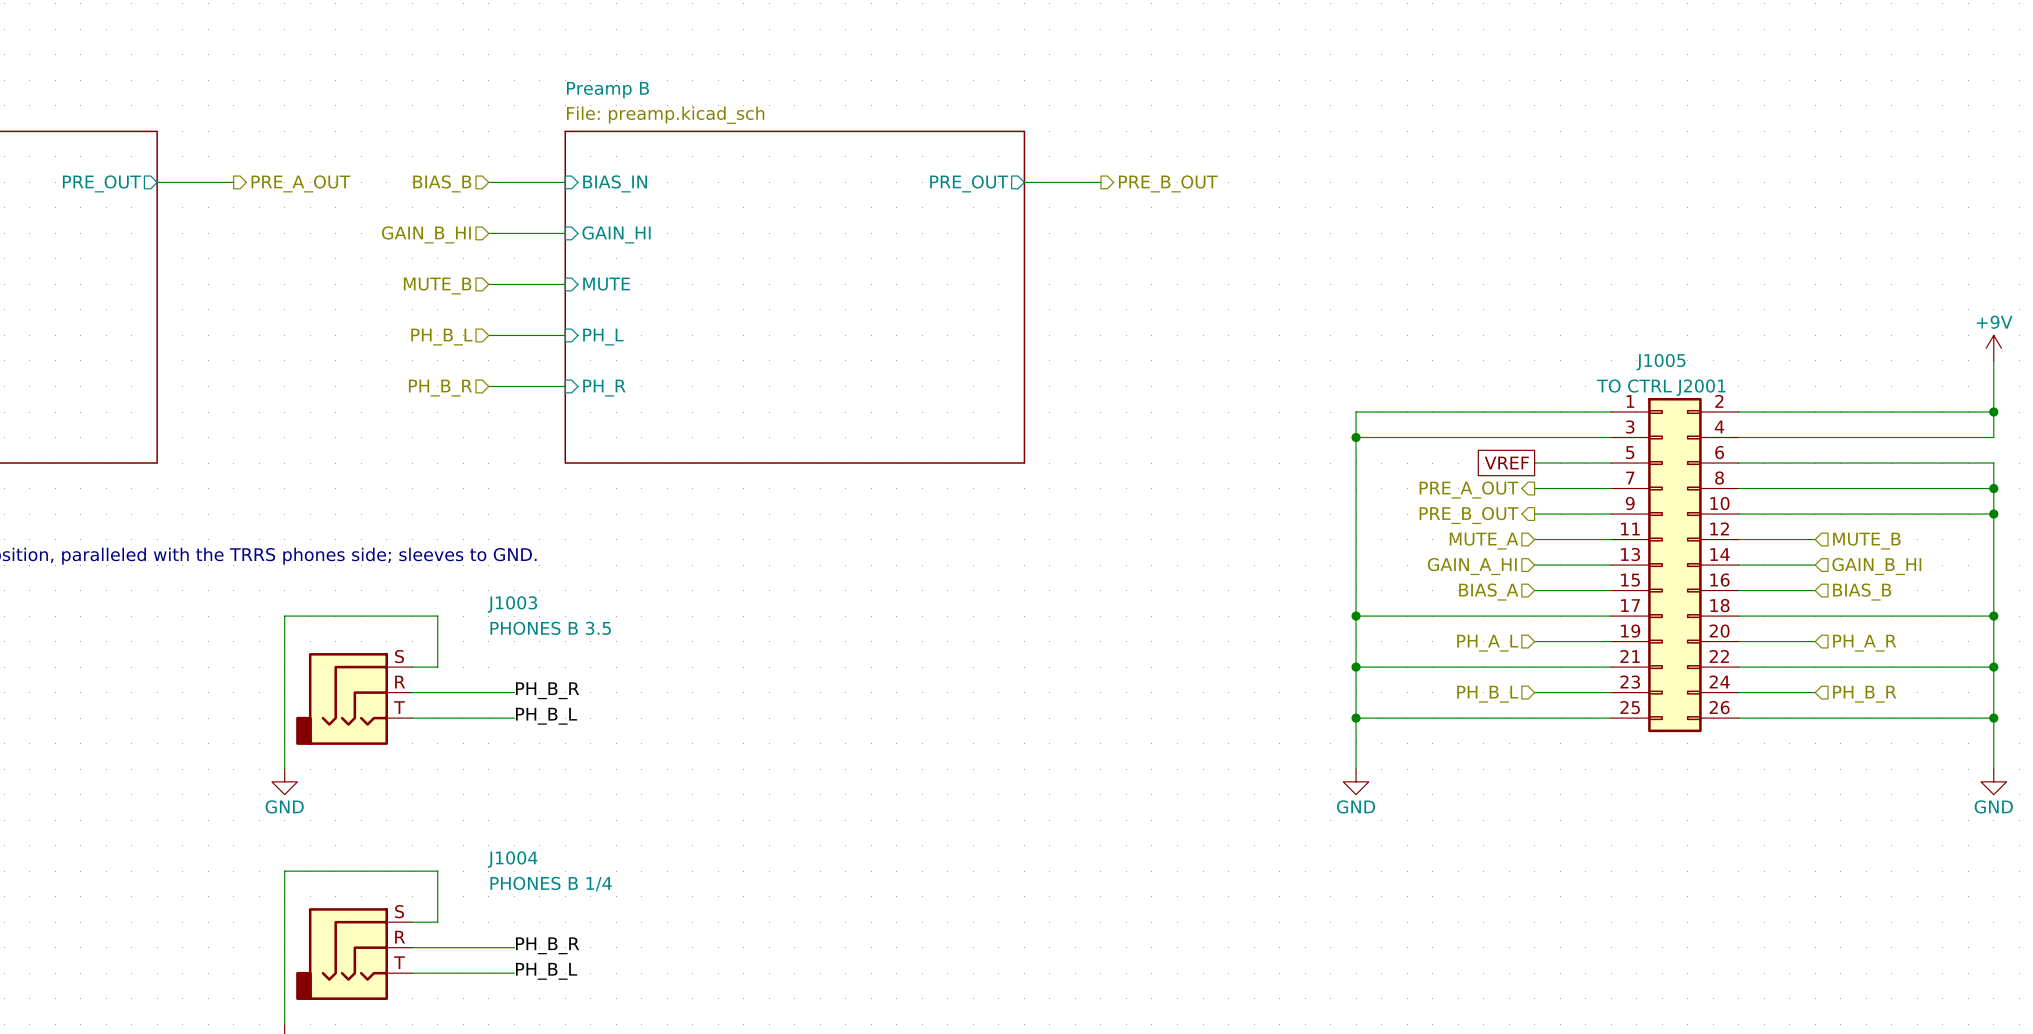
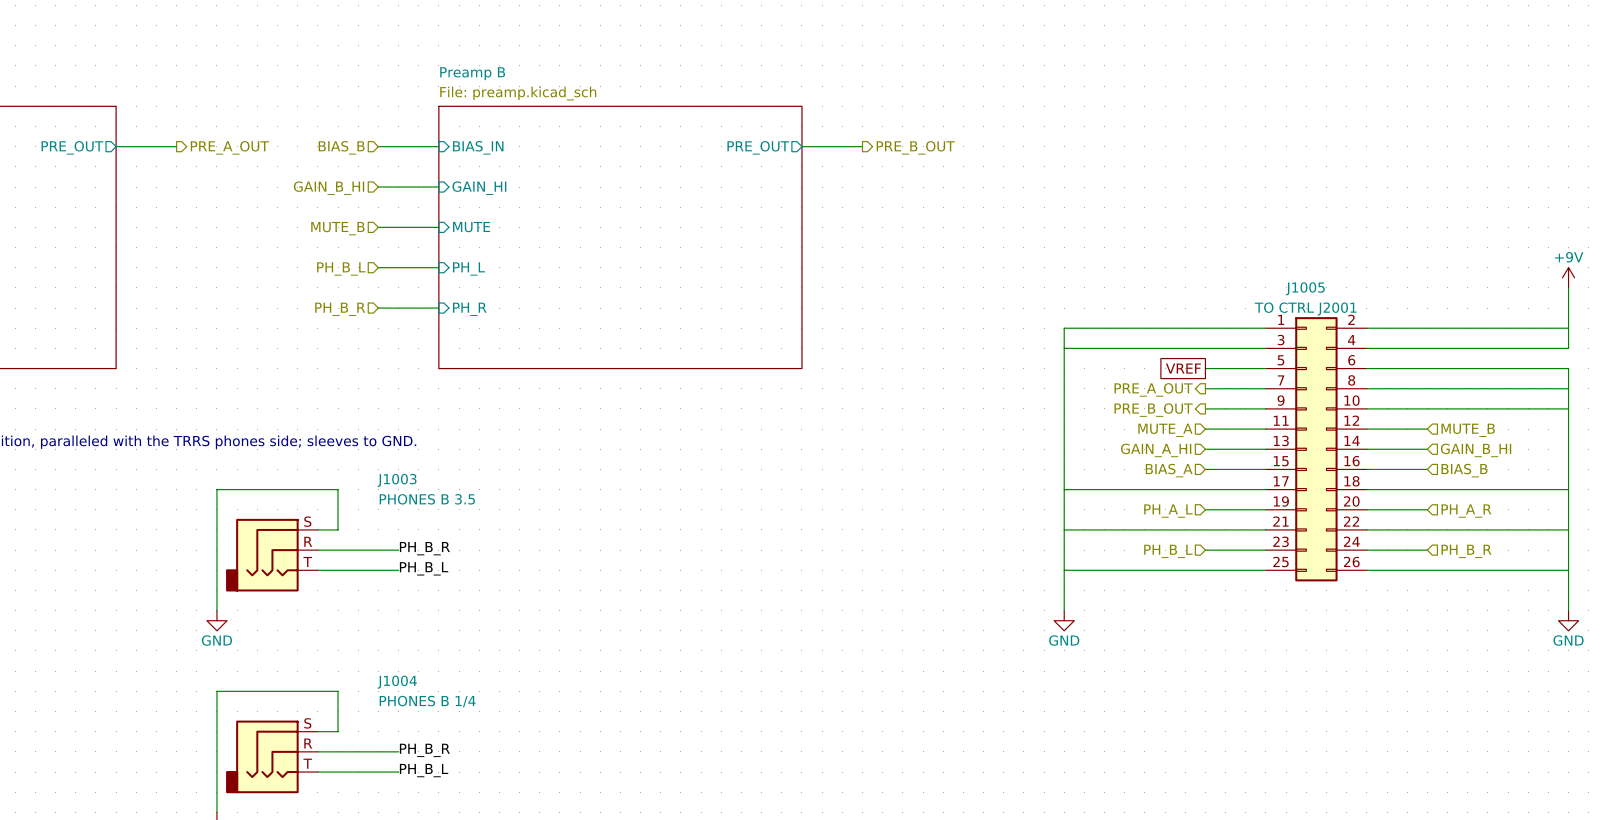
junction: (1993, 412) -> none
junction: (1356, 437) -> none
junction: (1993, 488) -> none
junction: (1993, 514) -> none
junction: (1356, 616) -> none
junction: (1993, 616) -> none
junction: (1356, 667) -> none
junction: (1993, 667) -> none
junction: (1356, 718) -> none
junction: (1993, 718) -> none

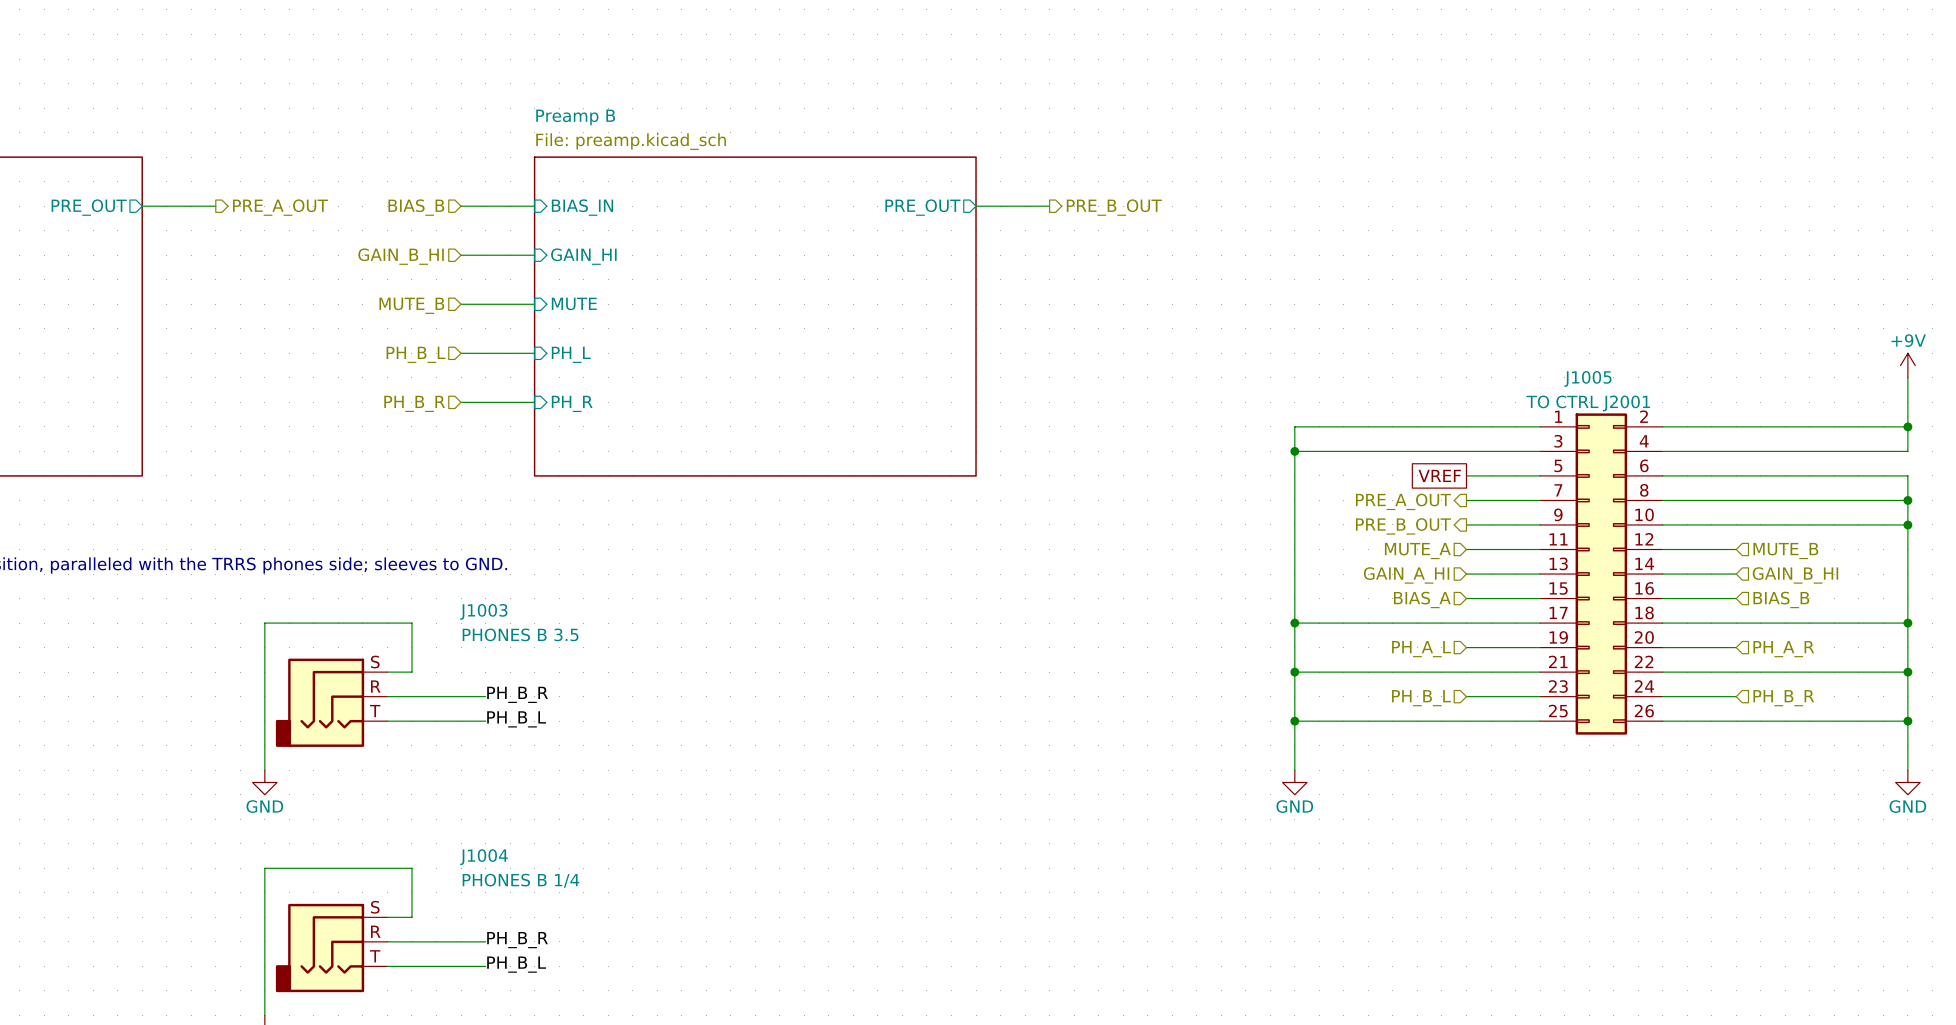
junction: none -> (1907, 426)
junction: none -> (1294, 451)
junction: none -> (1907, 500)
junction: none -> (1907, 524)
junction: none -> (1294, 623)
junction: none -> (1907, 623)
junction: none -> (1294, 672)
junction: none -> (1907, 672)
junction: none -> (1294, 721)
junction: none -> (1907, 721)

